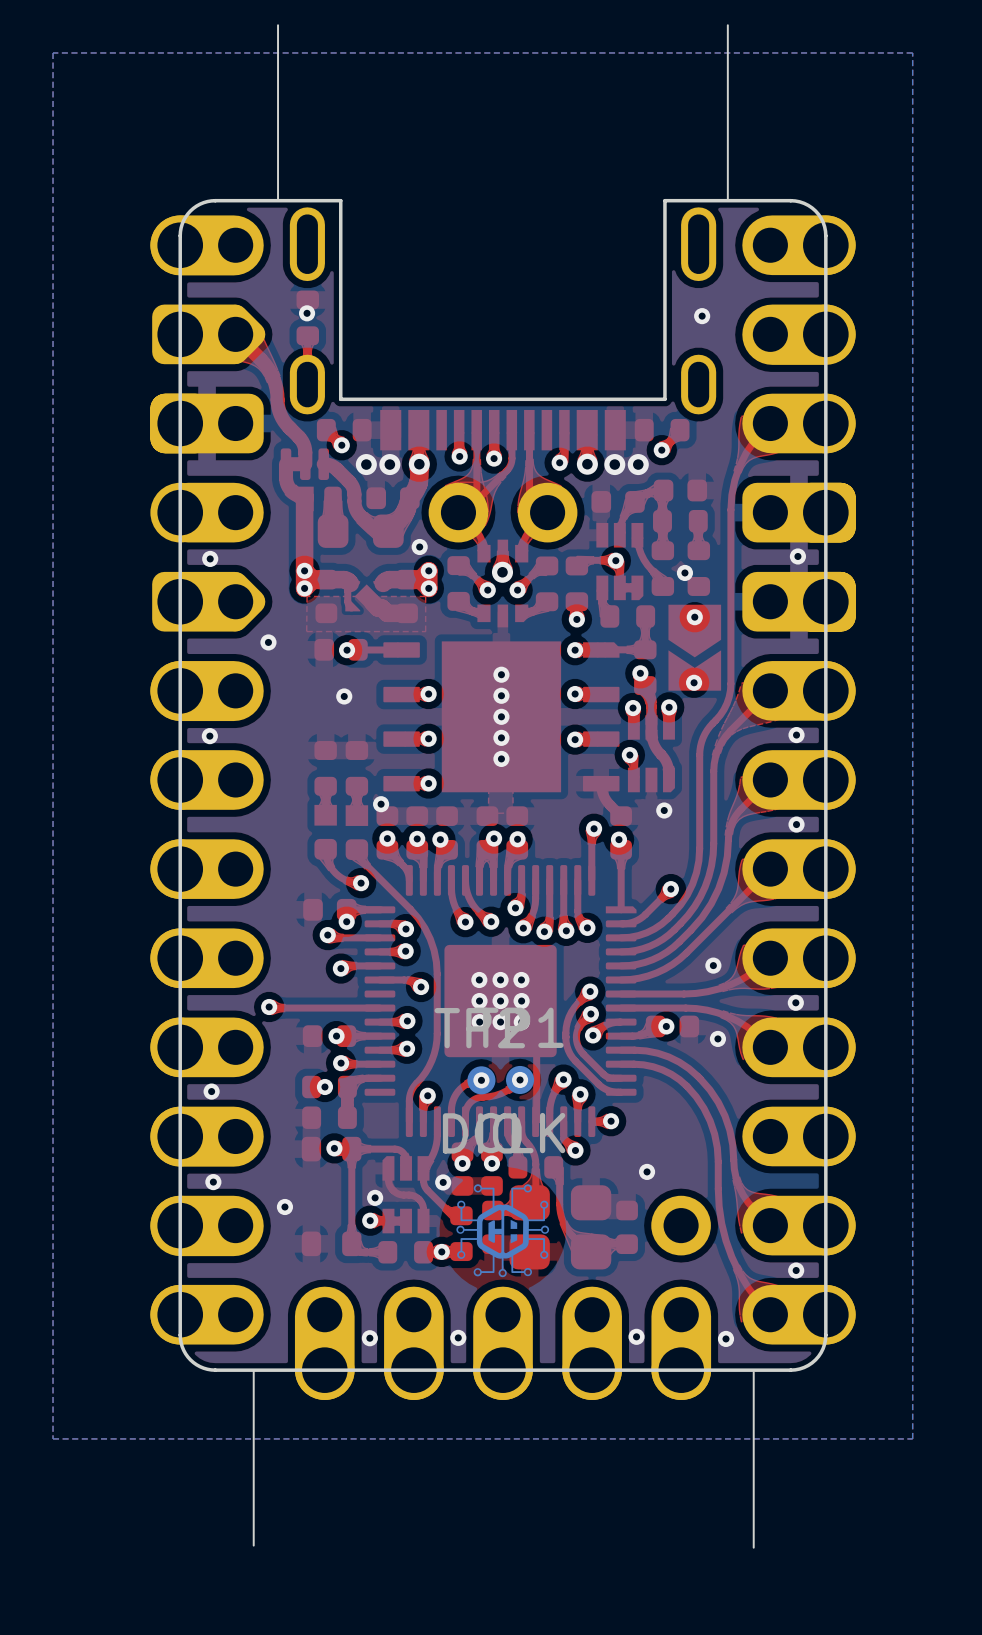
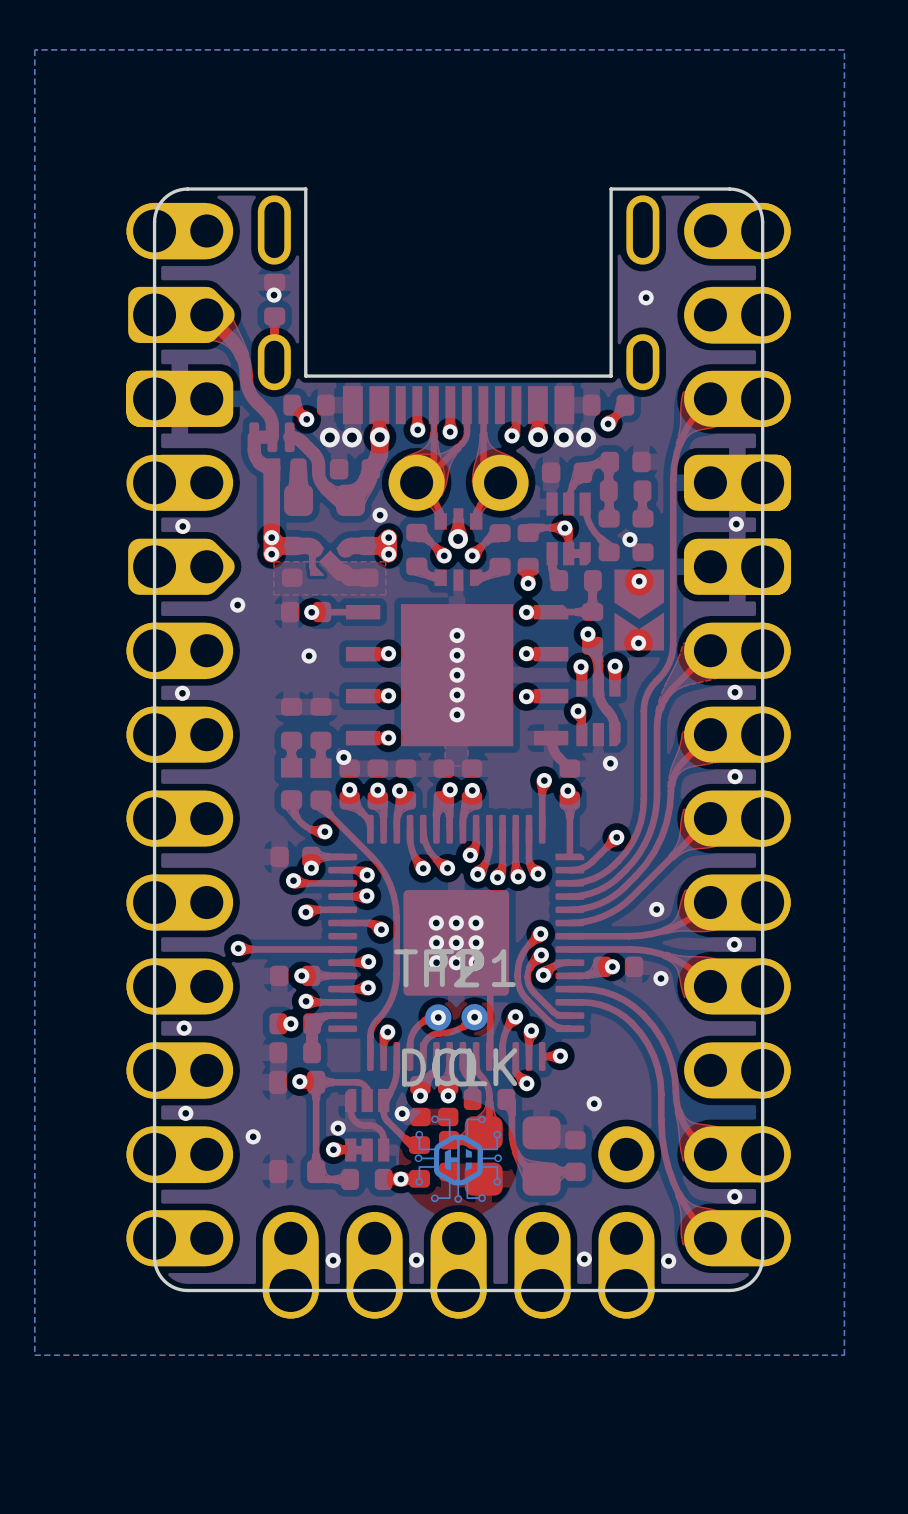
board edge: (278, 25) (278, 200) -> none
board edge: (727, 25) (727, 200) -> none
board edge: (253, 1370) (253, 1545) -> none
board edge: (753, 1372) (753, 1547) -> none

